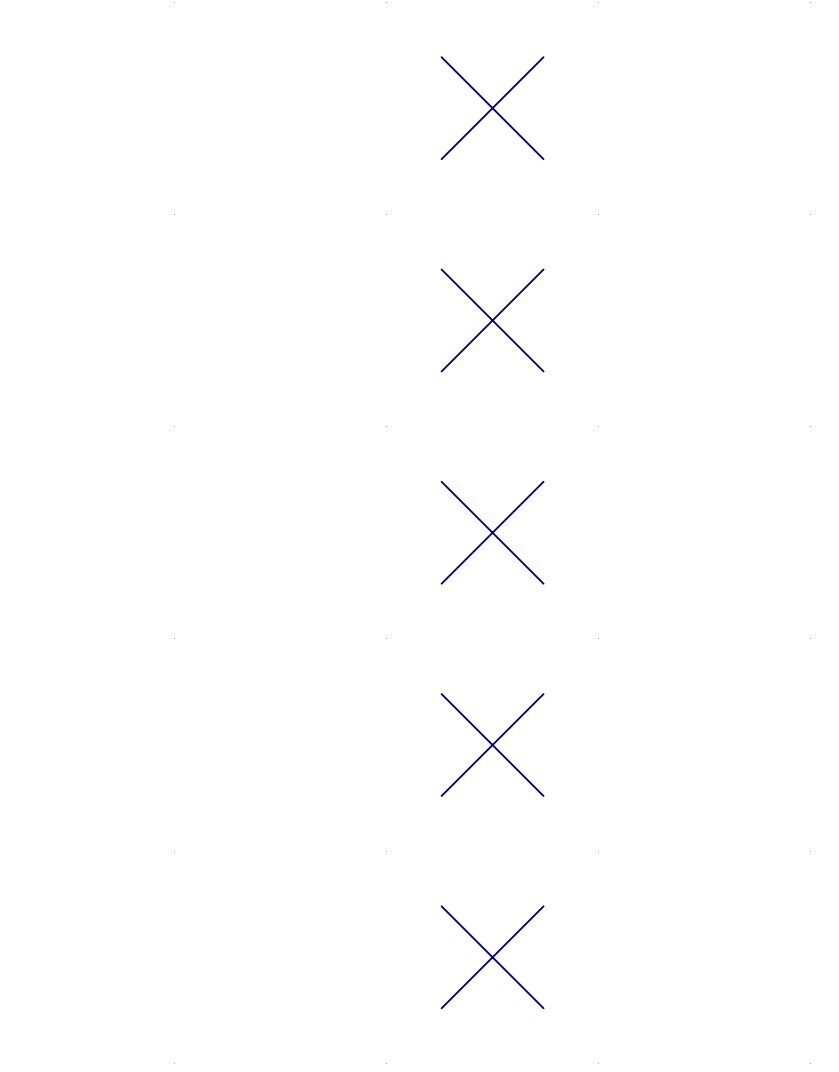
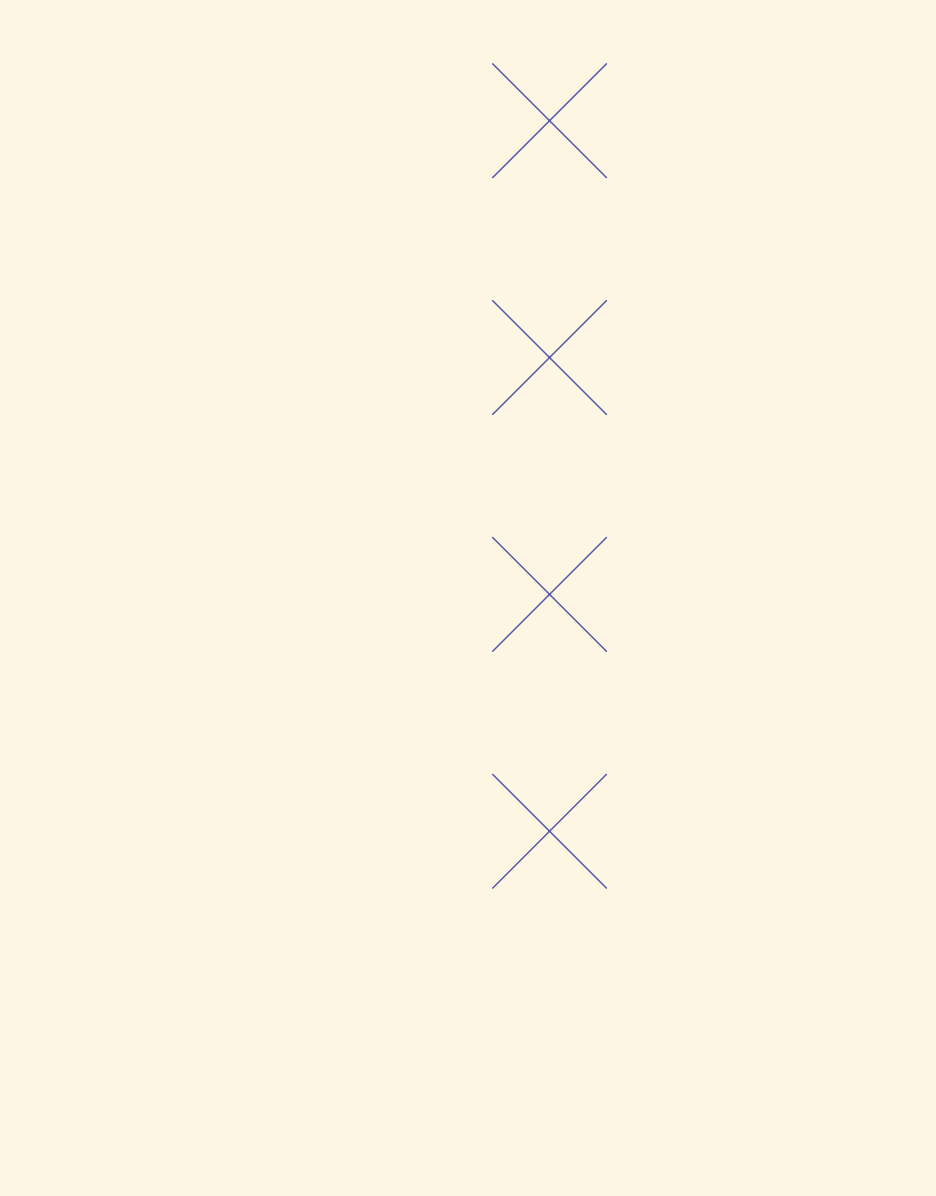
no-connect mark: (492, 957) -> none

